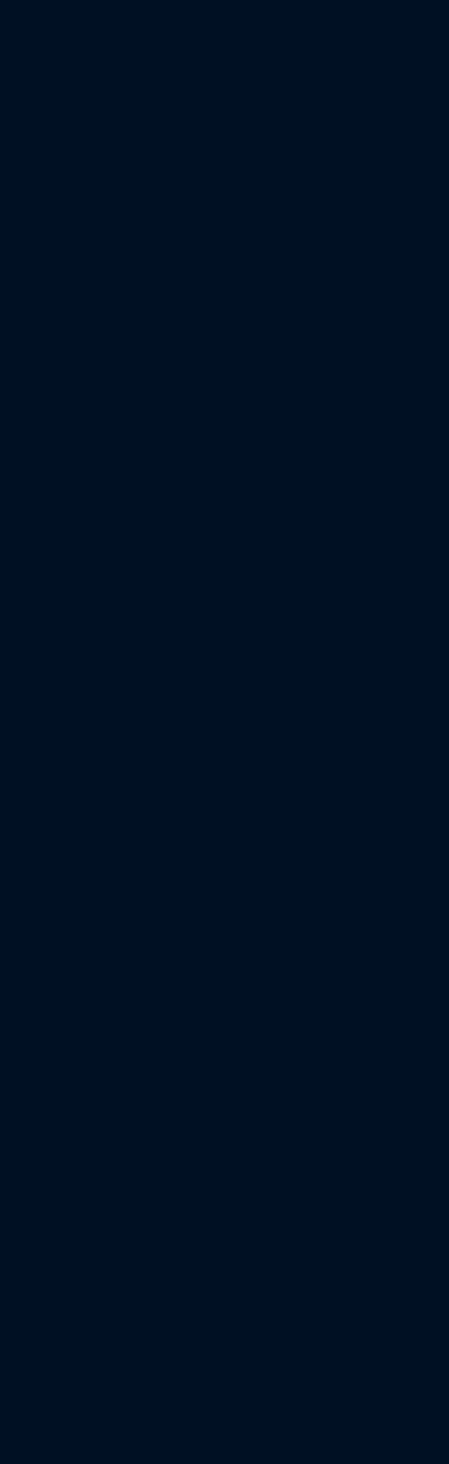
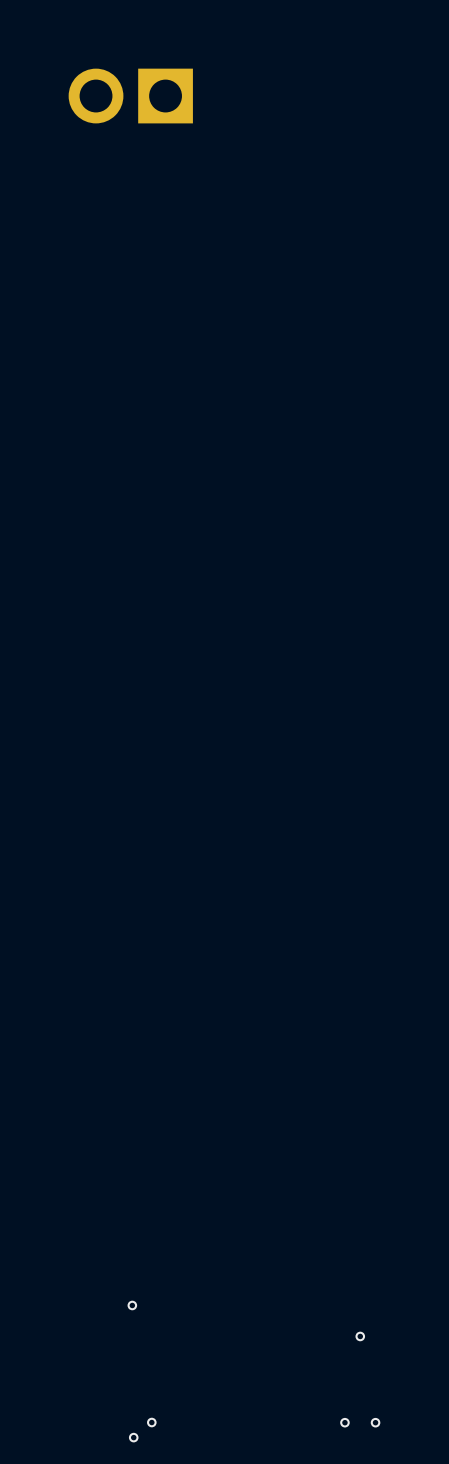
part: none -> (130, 96)
via: none -> (132, 1305)
via: none -> (360, 1336)
via: none -> (151, 1422)
via: none -> (344, 1422)
via: none -> (375, 1422)
via: none -> (133, 1437)

